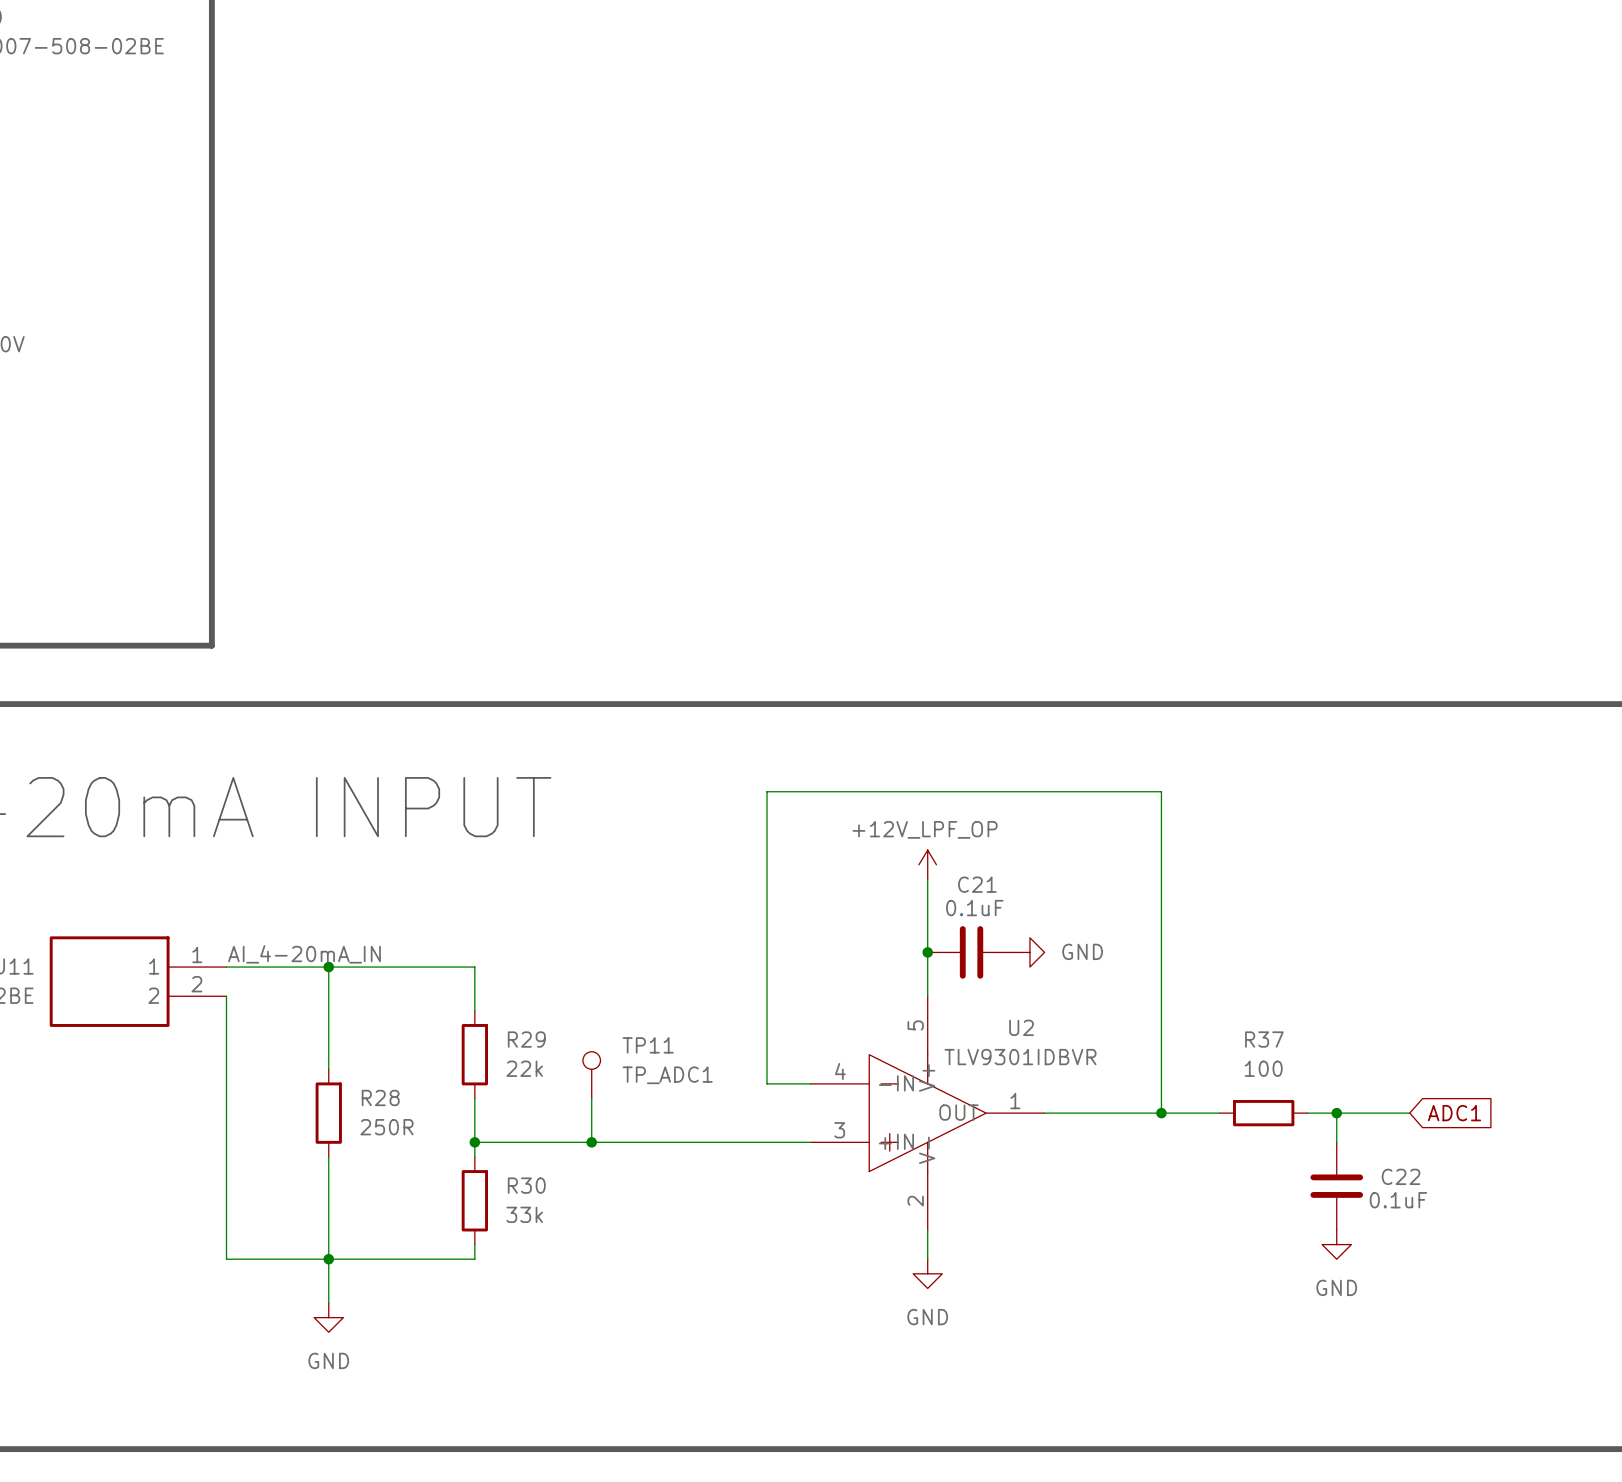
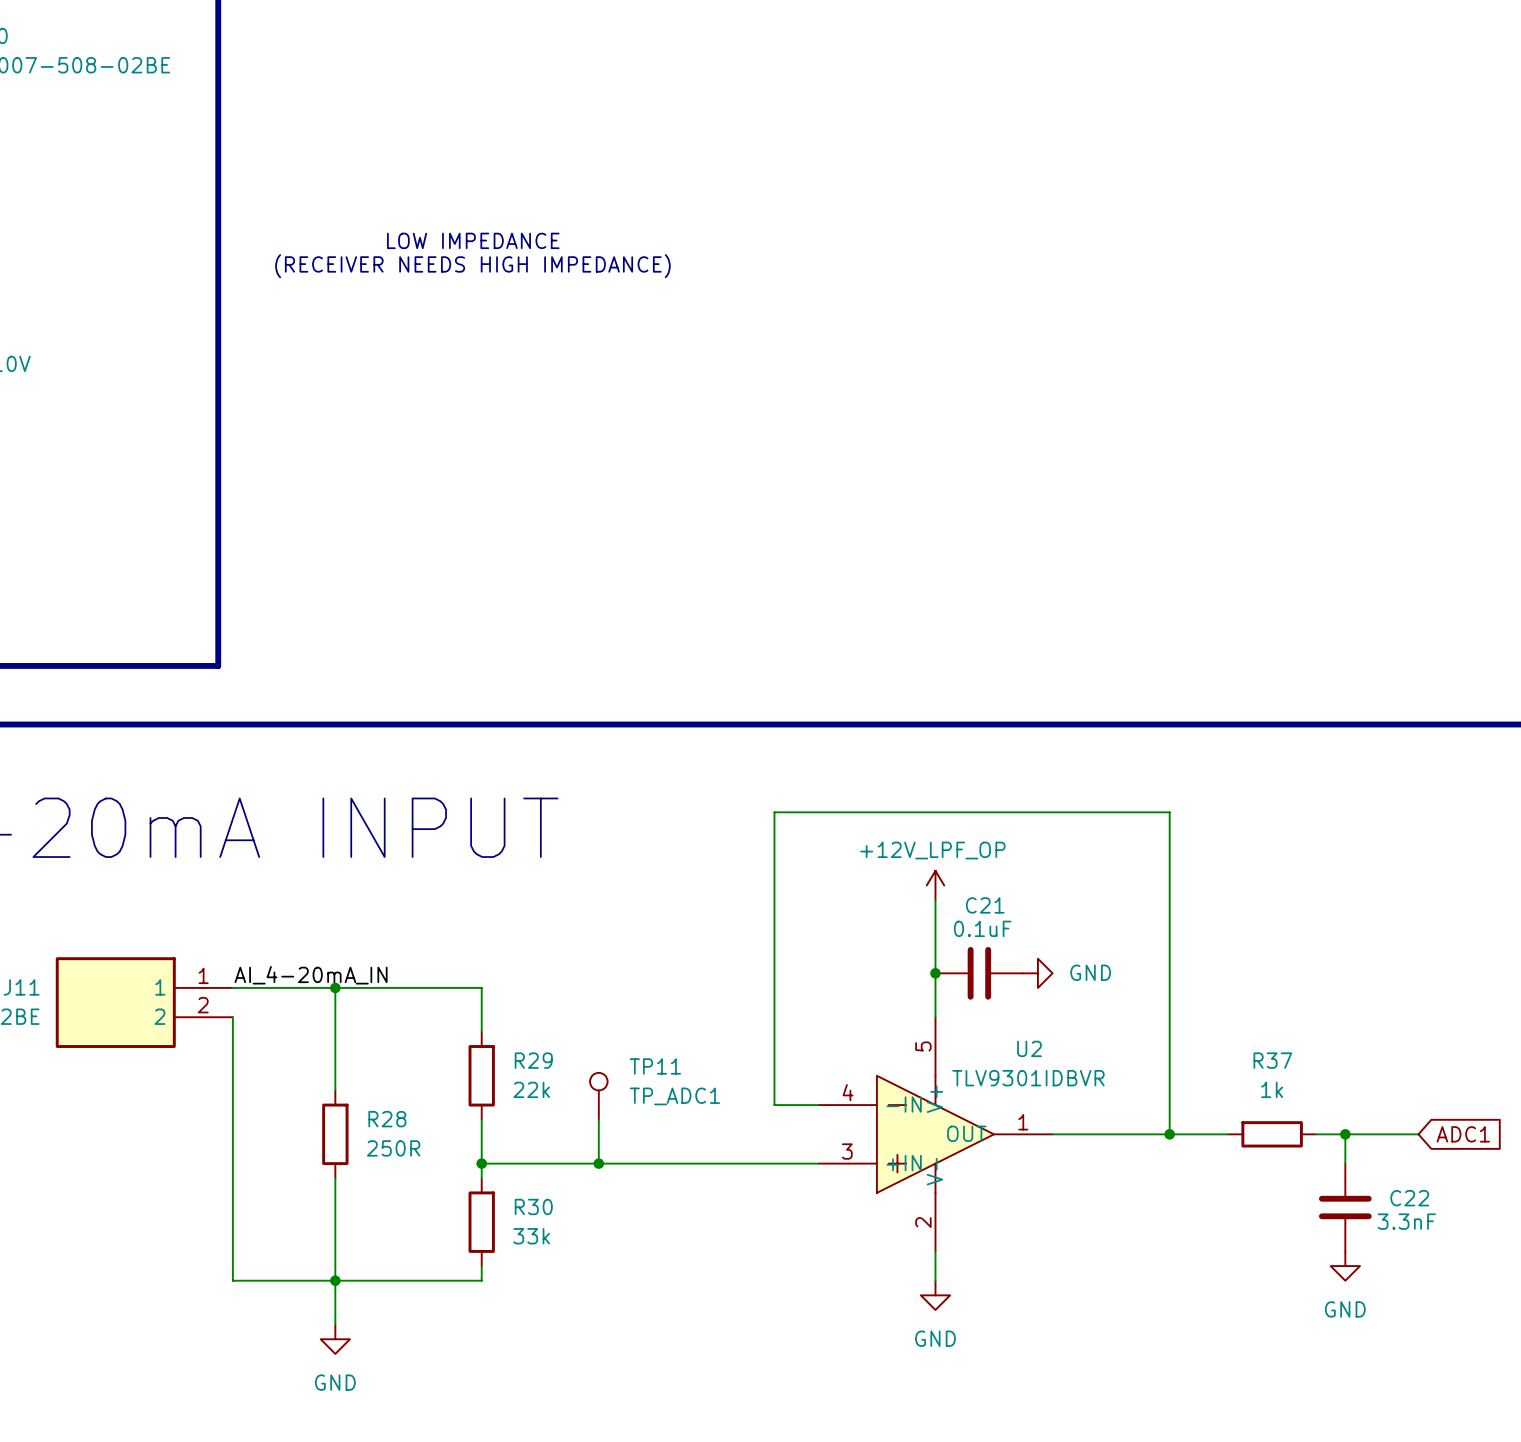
text: none -> LOW IMPEDANCE (473, 240)
text: none -> (RECEIVER NEEDS HIGH IMPEDANCE) (472, 266)
R37 value: 100 (1263, 1068) -> 1k (1272, 1089)
C22 value: 0.1uF (1398, 1200) -> 3.3nF (1406, 1221)

